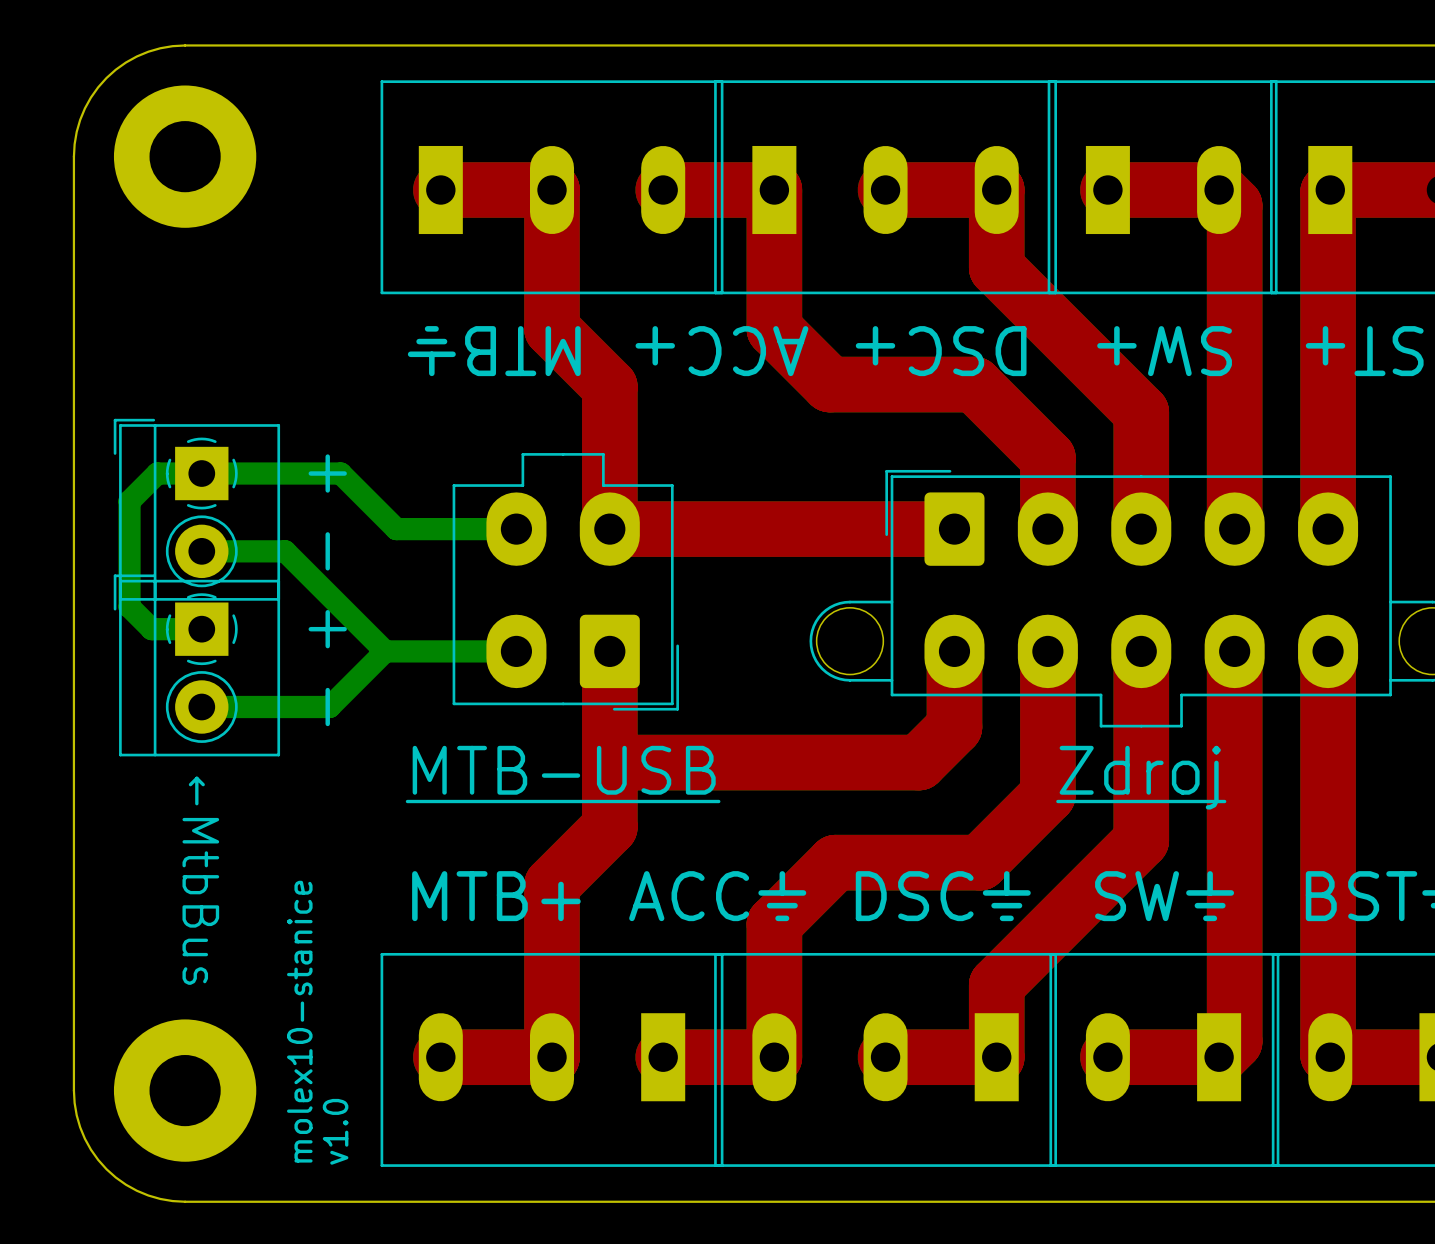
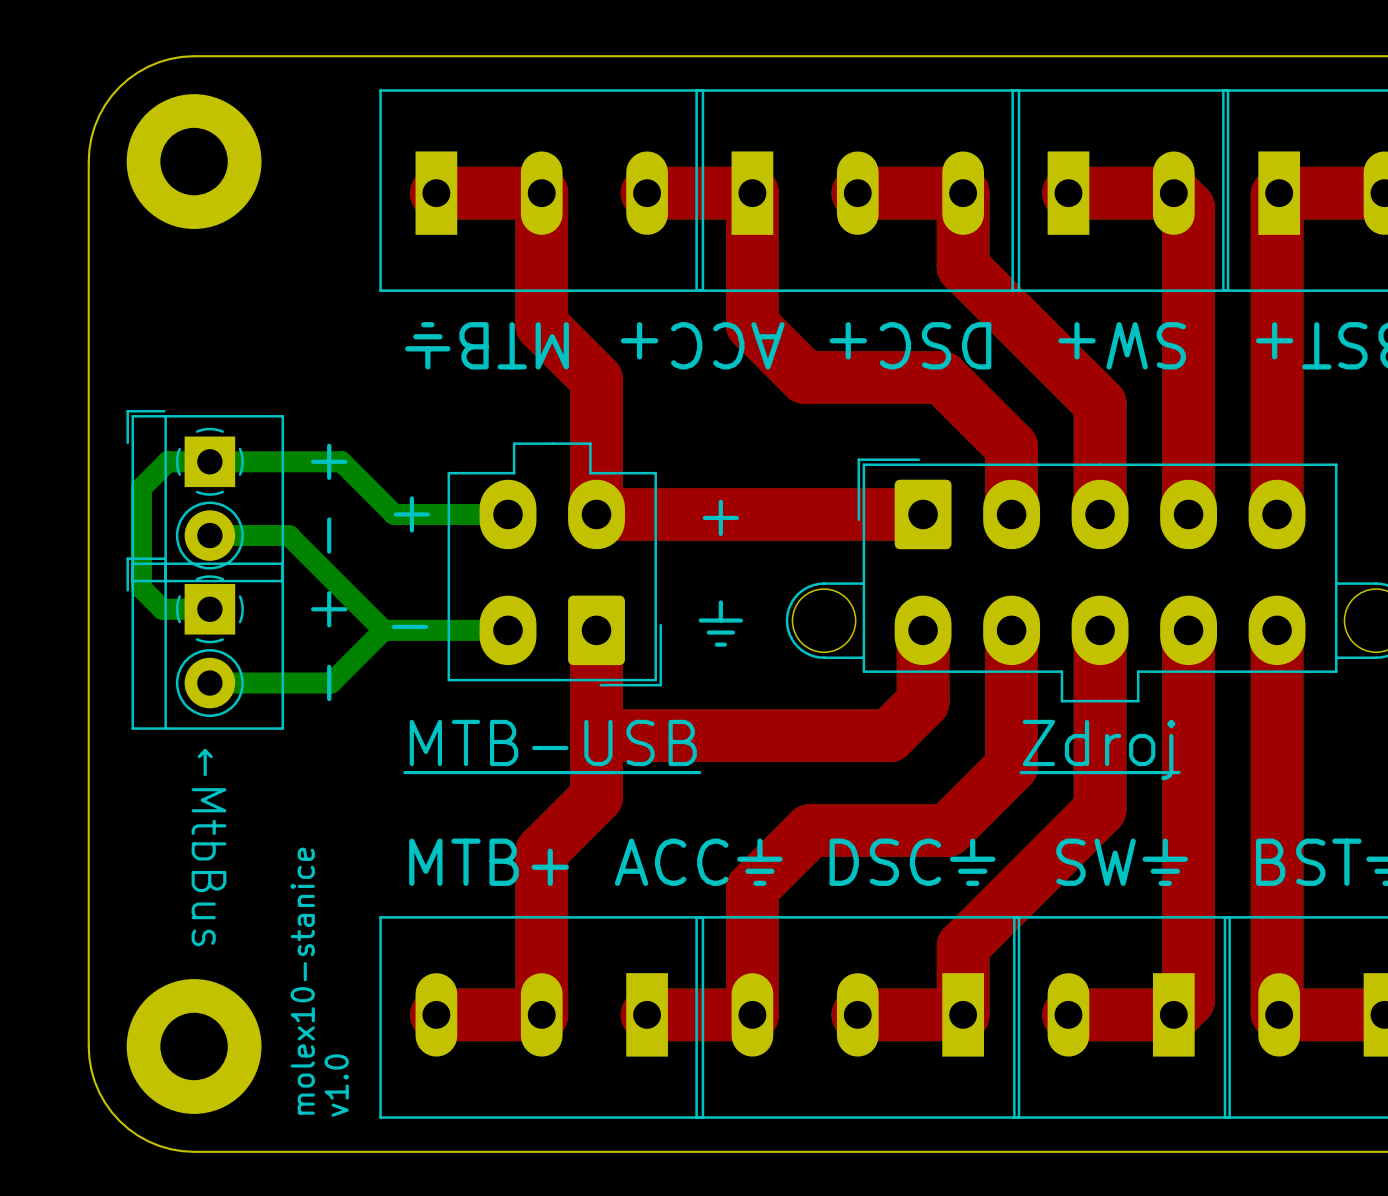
text: none -> + (411, 514)
text: none -> + (720, 517)
text: none -> ⏚ (720, 623)
text: none -> - (410, 626)

